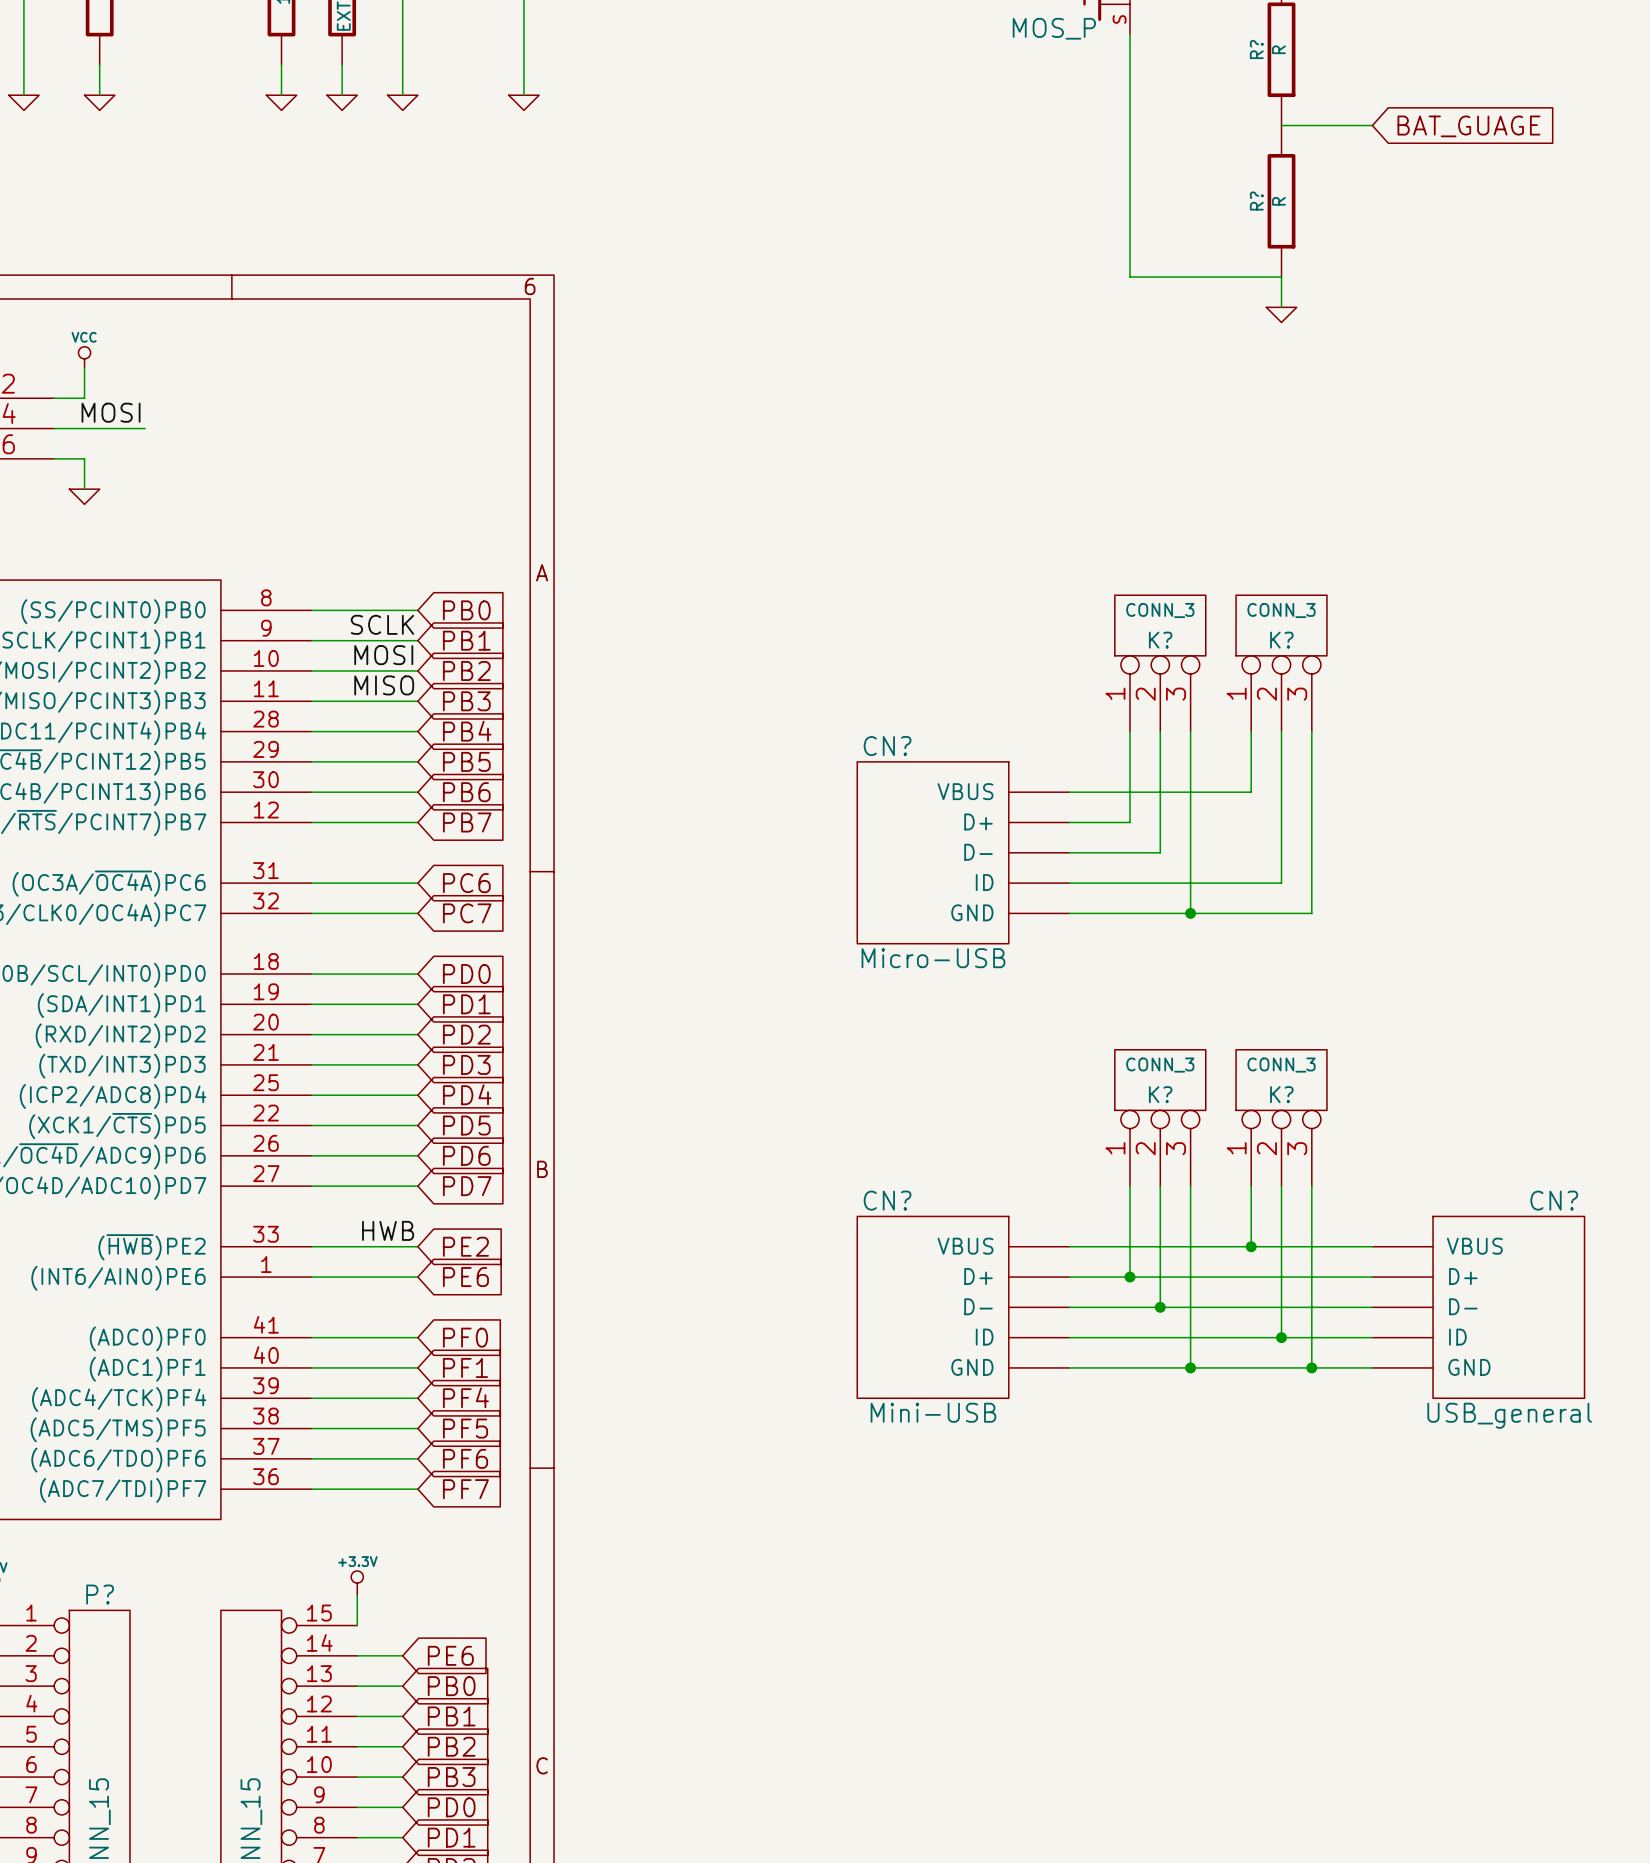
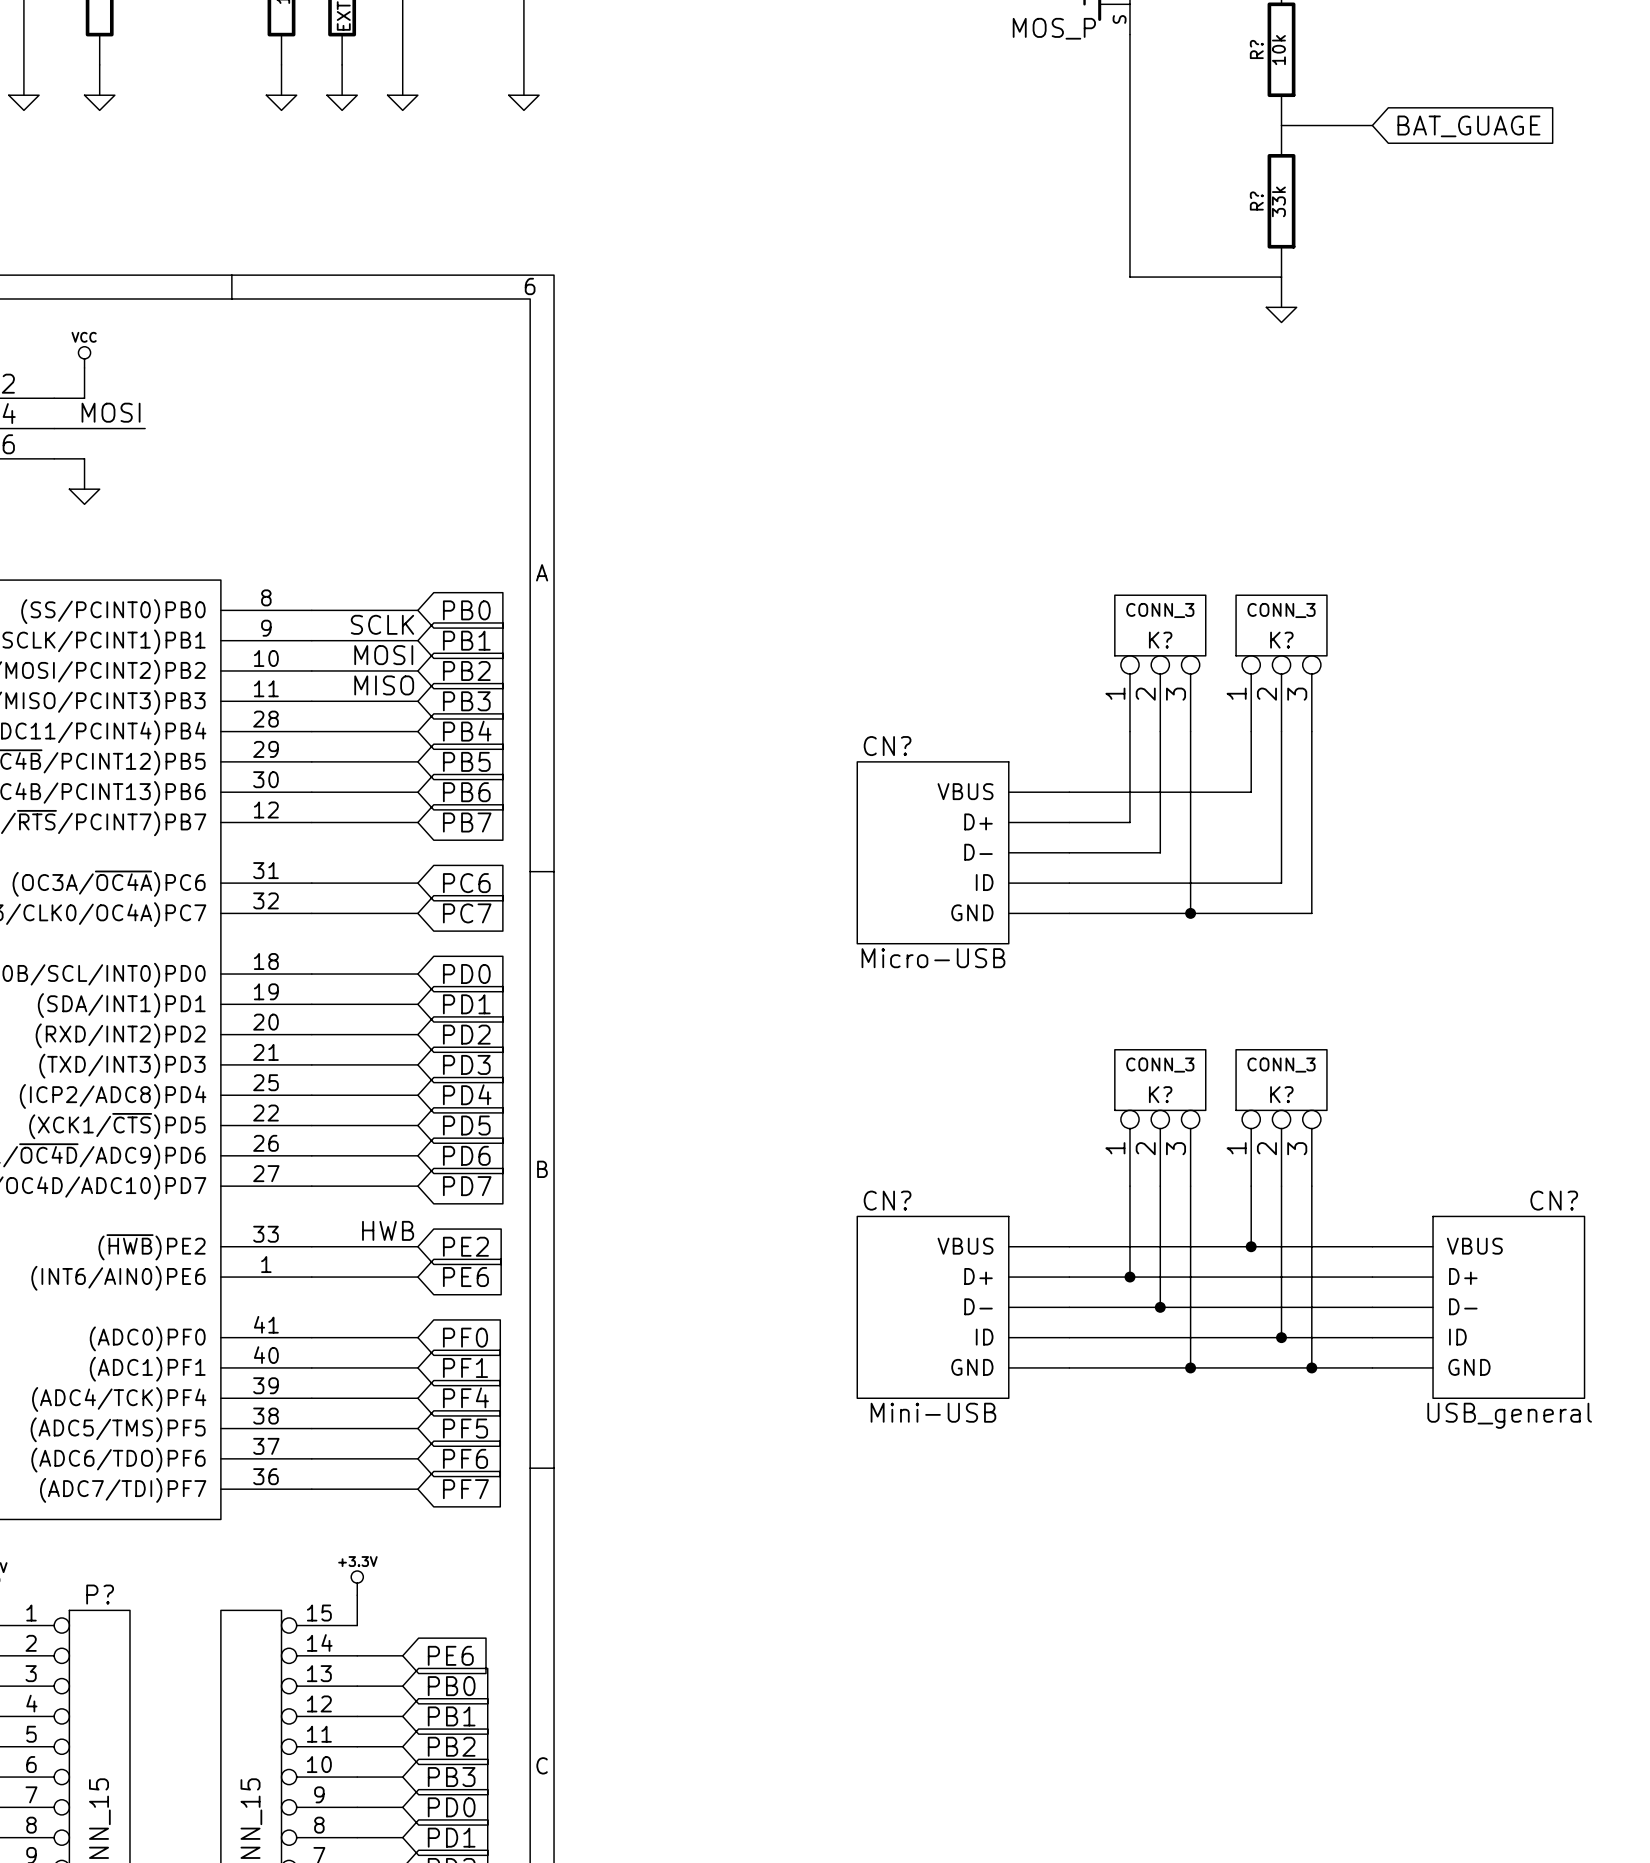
R? value: R (1278, 49) -> 10k (1278, 50)
R? value: R (1278, 201) -> 33k (1278, 201)

